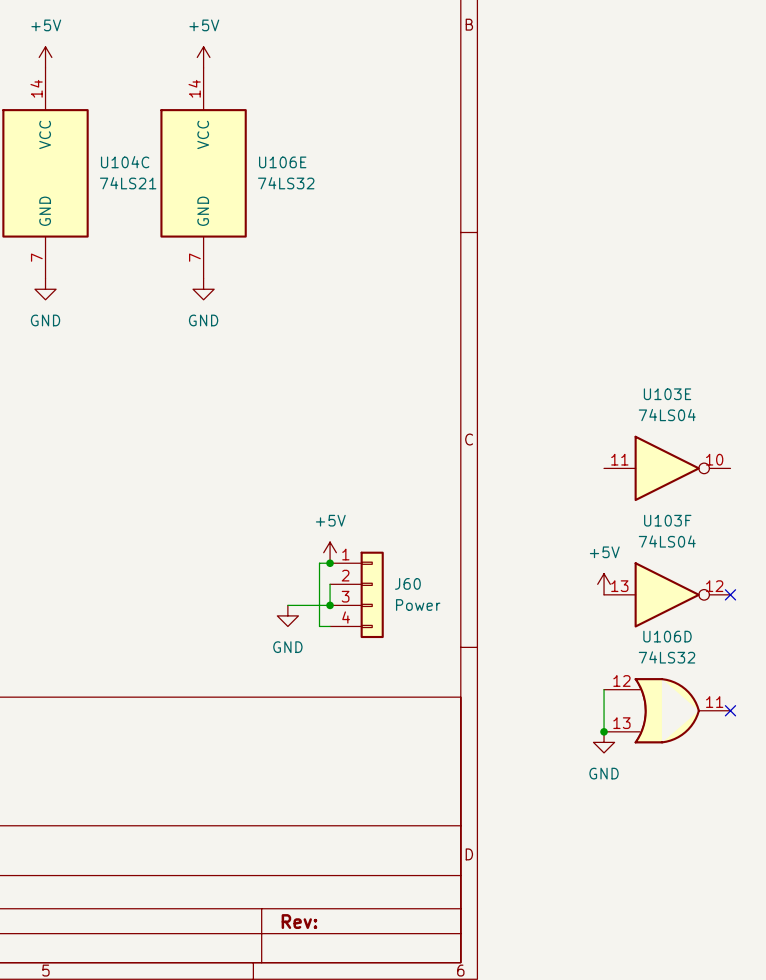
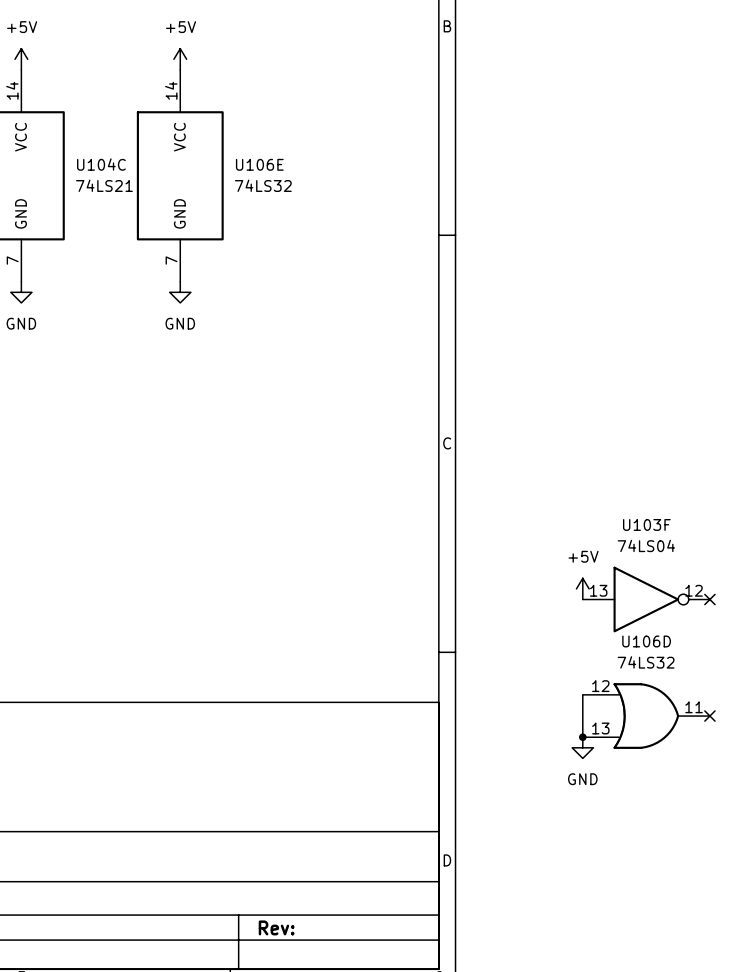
U103E: 74LS04 (667, 468) -> none
power symbol: +5V (330, 552) -> none
wire: (330, 563) (319, 563) (319, 626) (330, 626) -> none
junction: (330, 563) -> none
wire: (330, 584) (330, 605) (287, 605) -> none
J60: Power (356, 594) -> none
junction: (330, 605) -> none
power symbol: GND (287, 615) -> none

